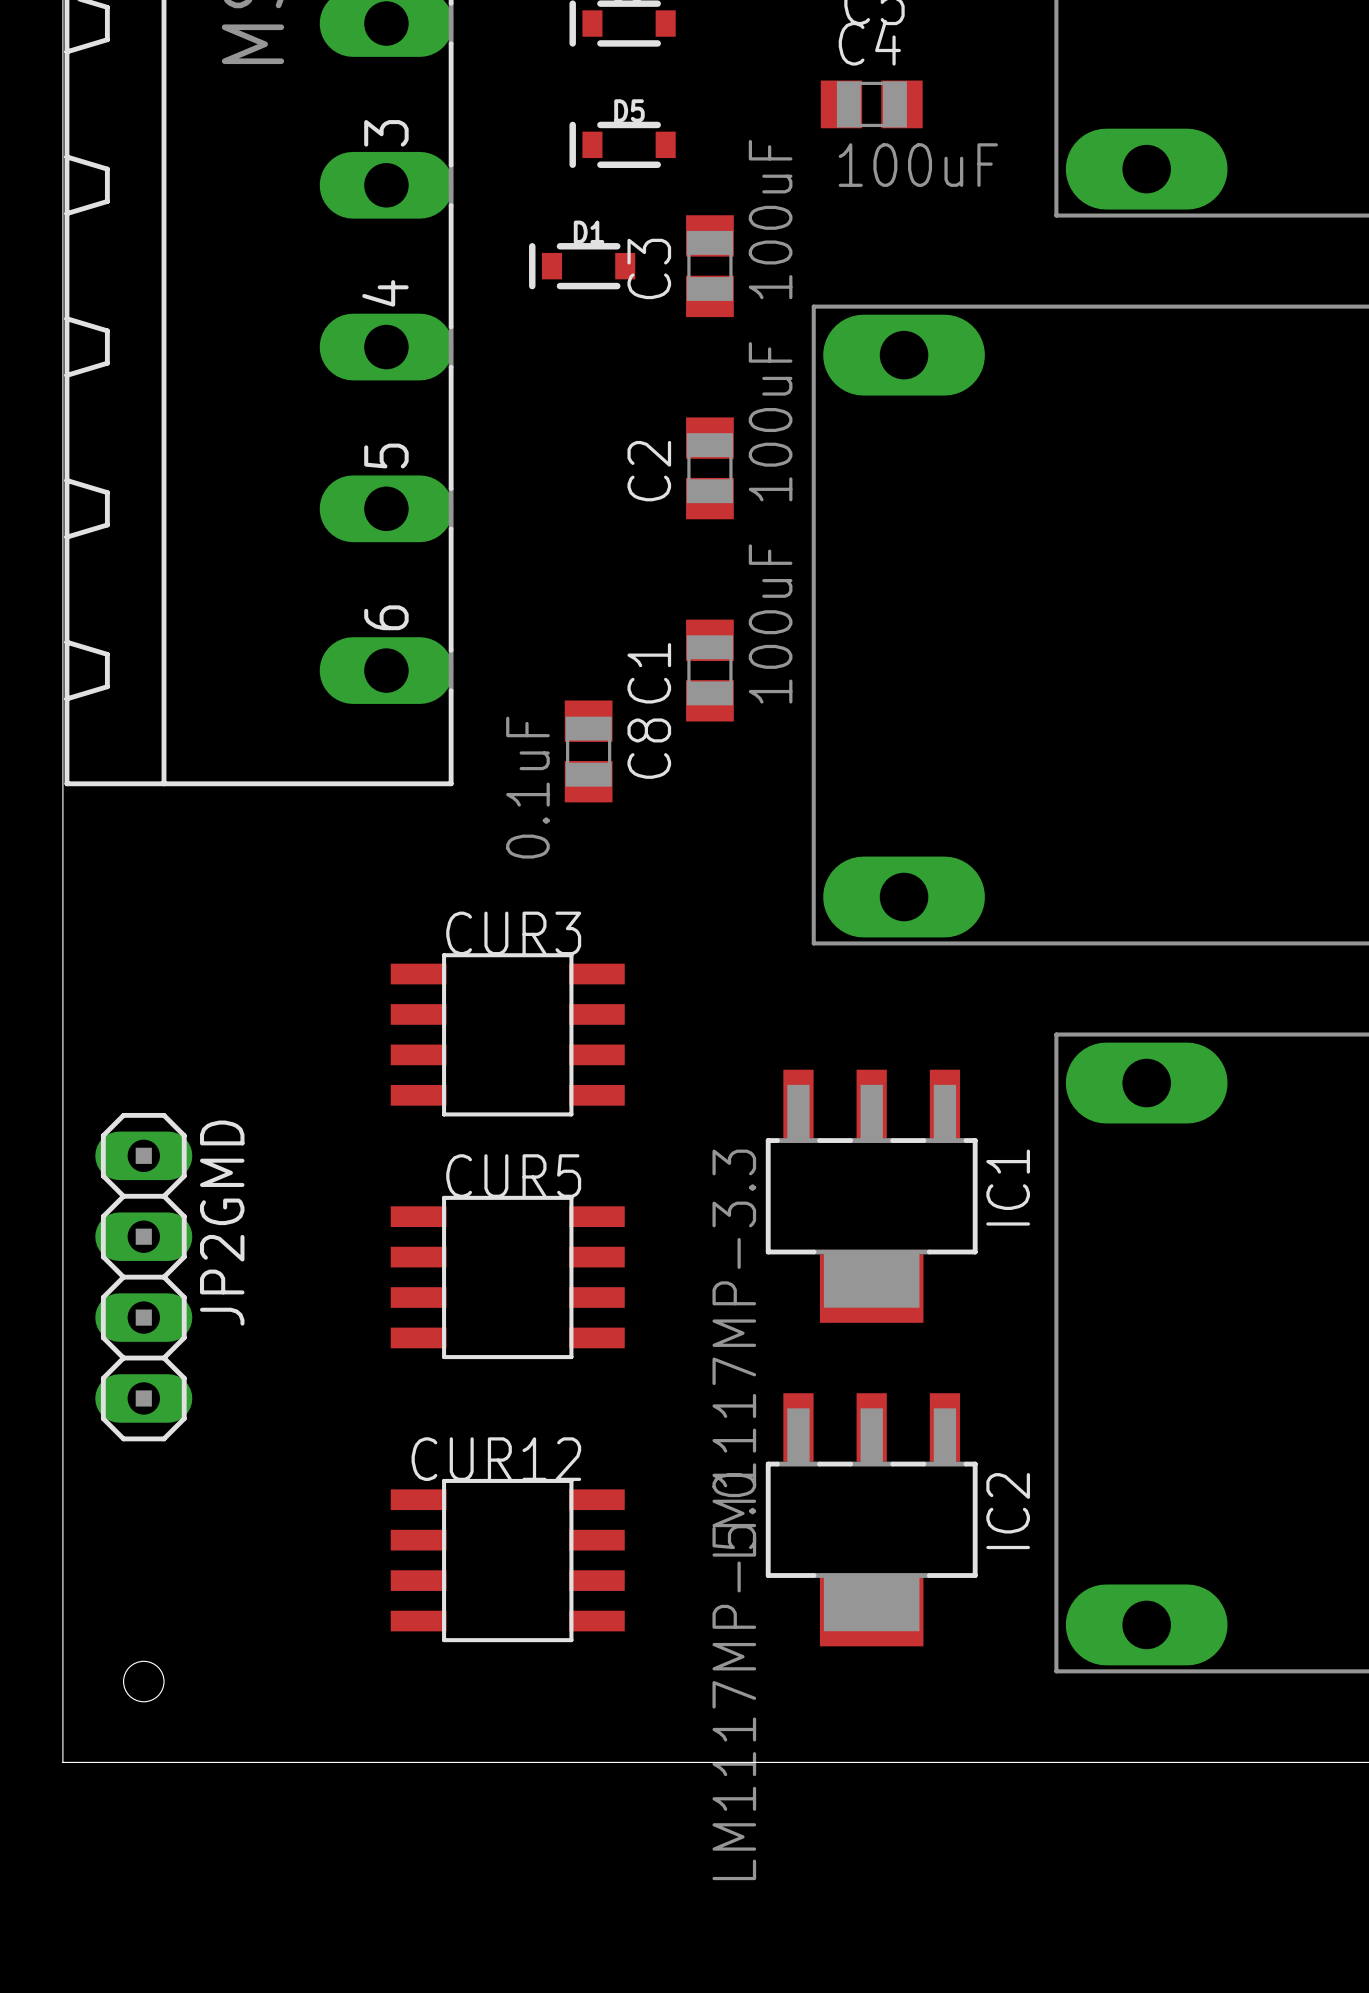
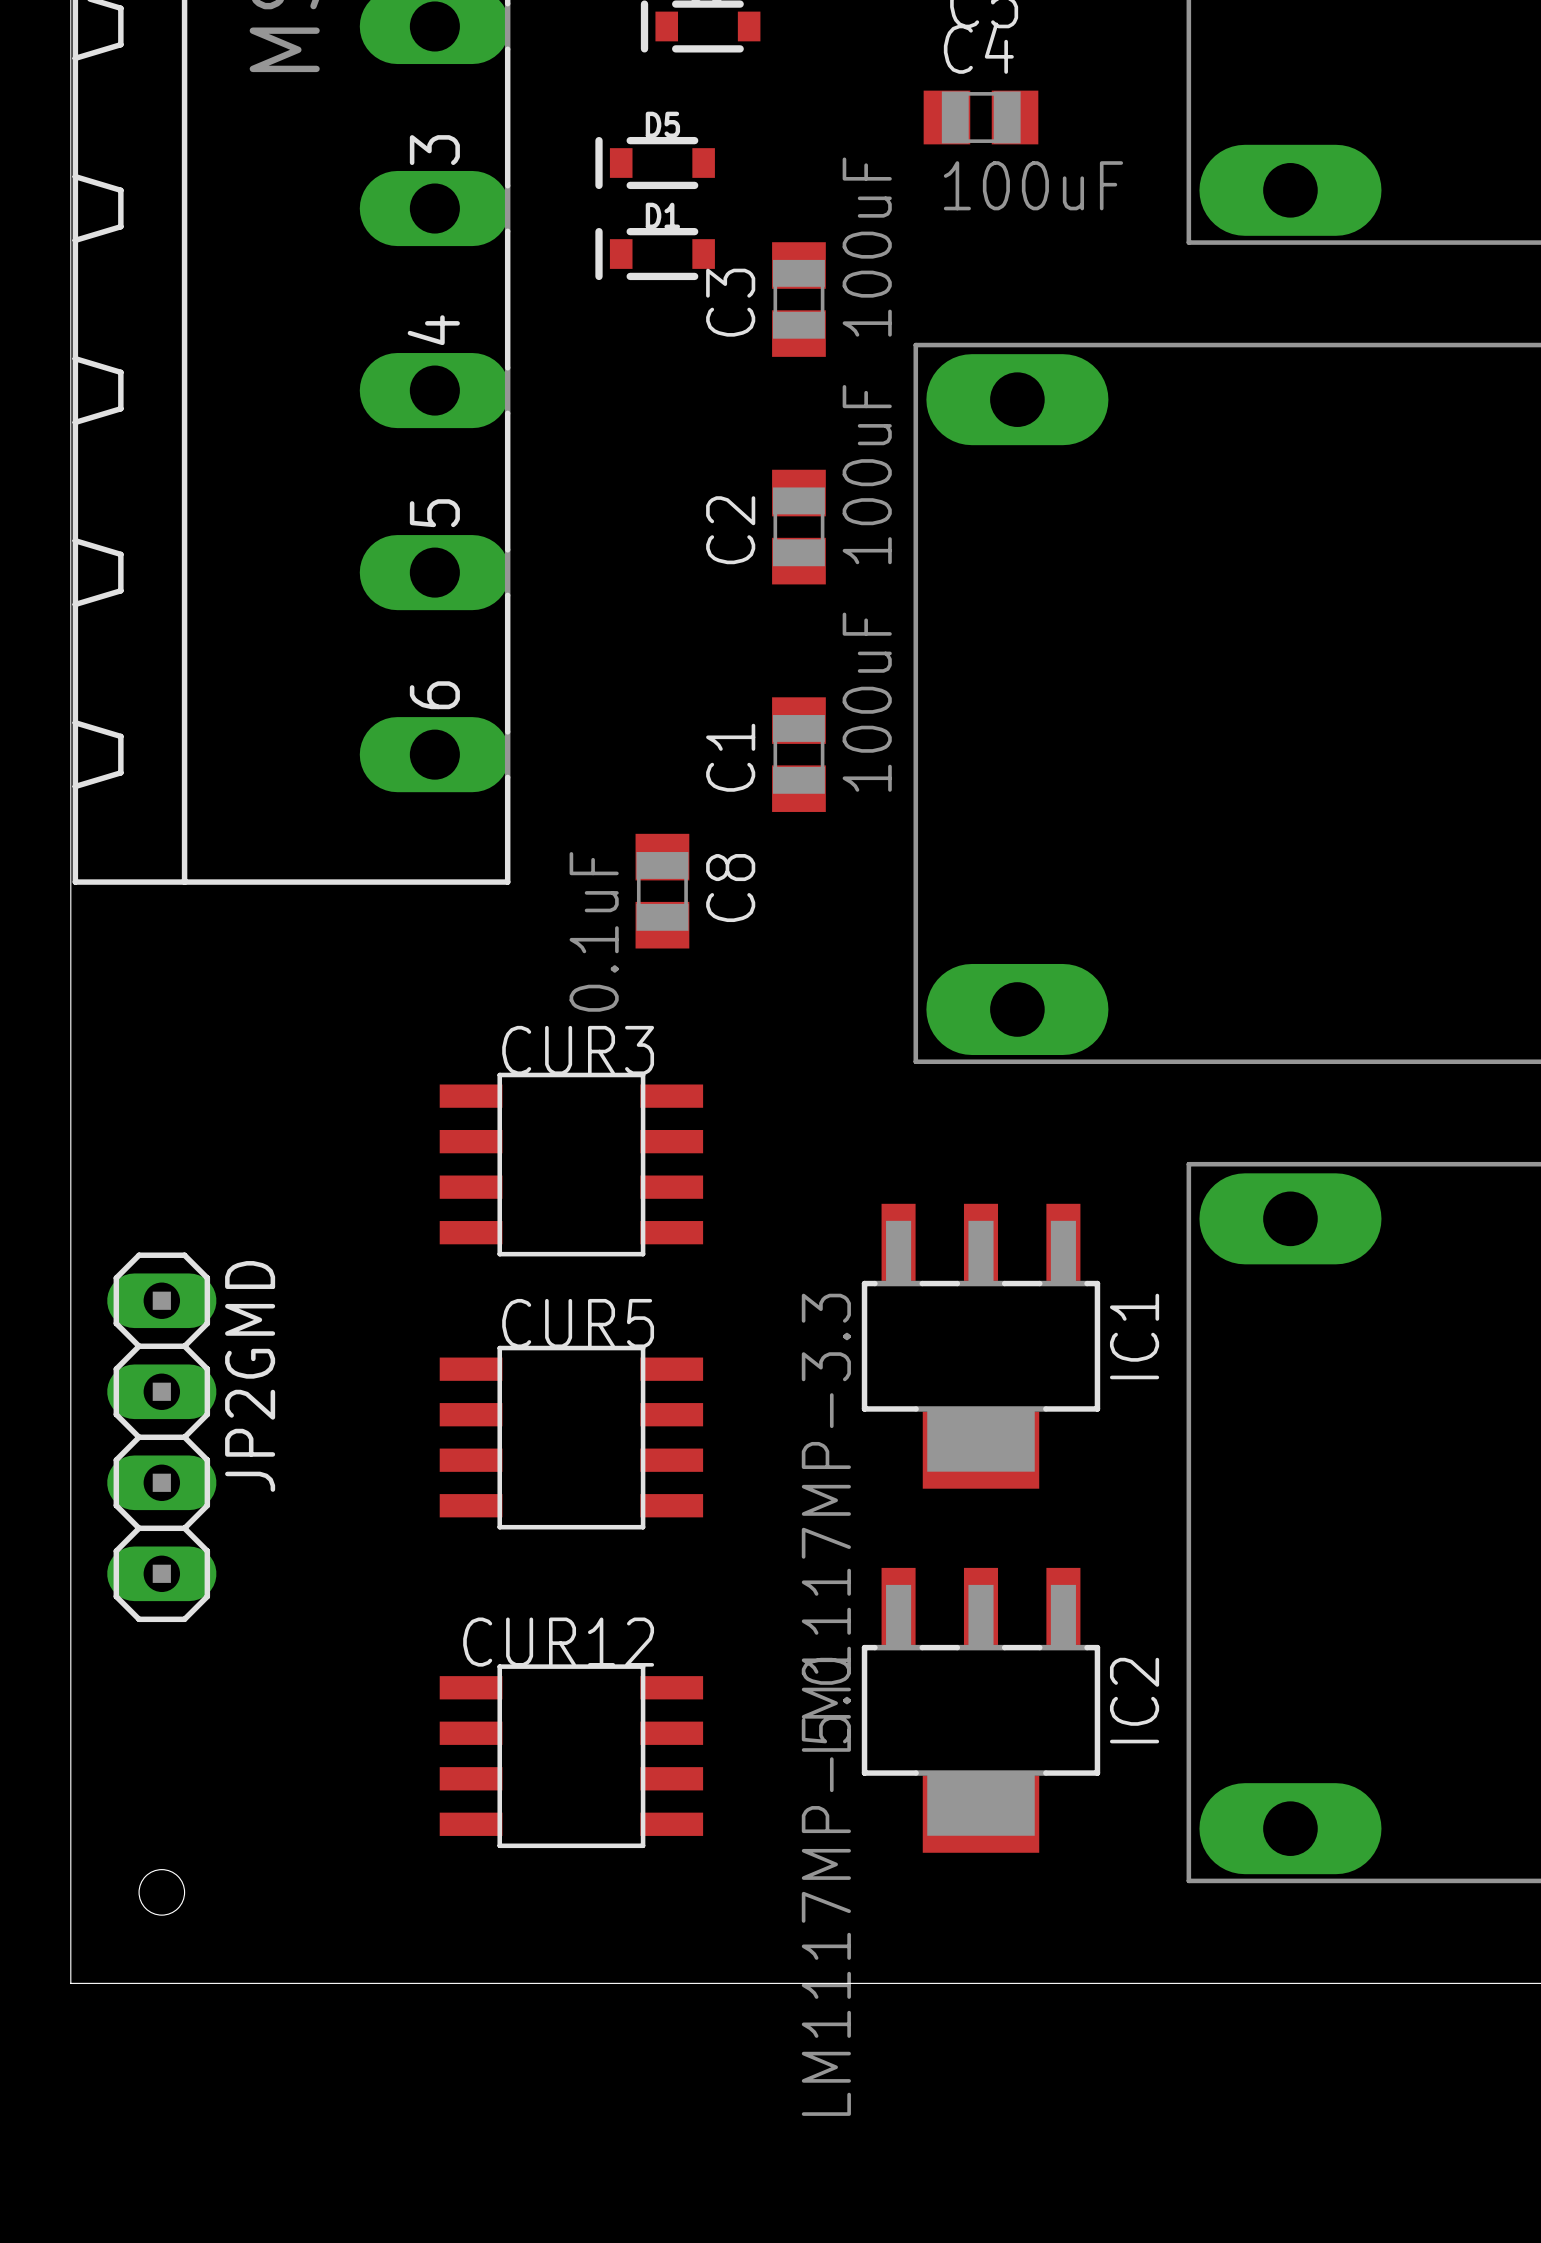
D5 position: (622, 144) -> (655, 163)
D1 position: (582, 266) -> (655, 254)
C8 position: (588, 751) -> (662, 891)

